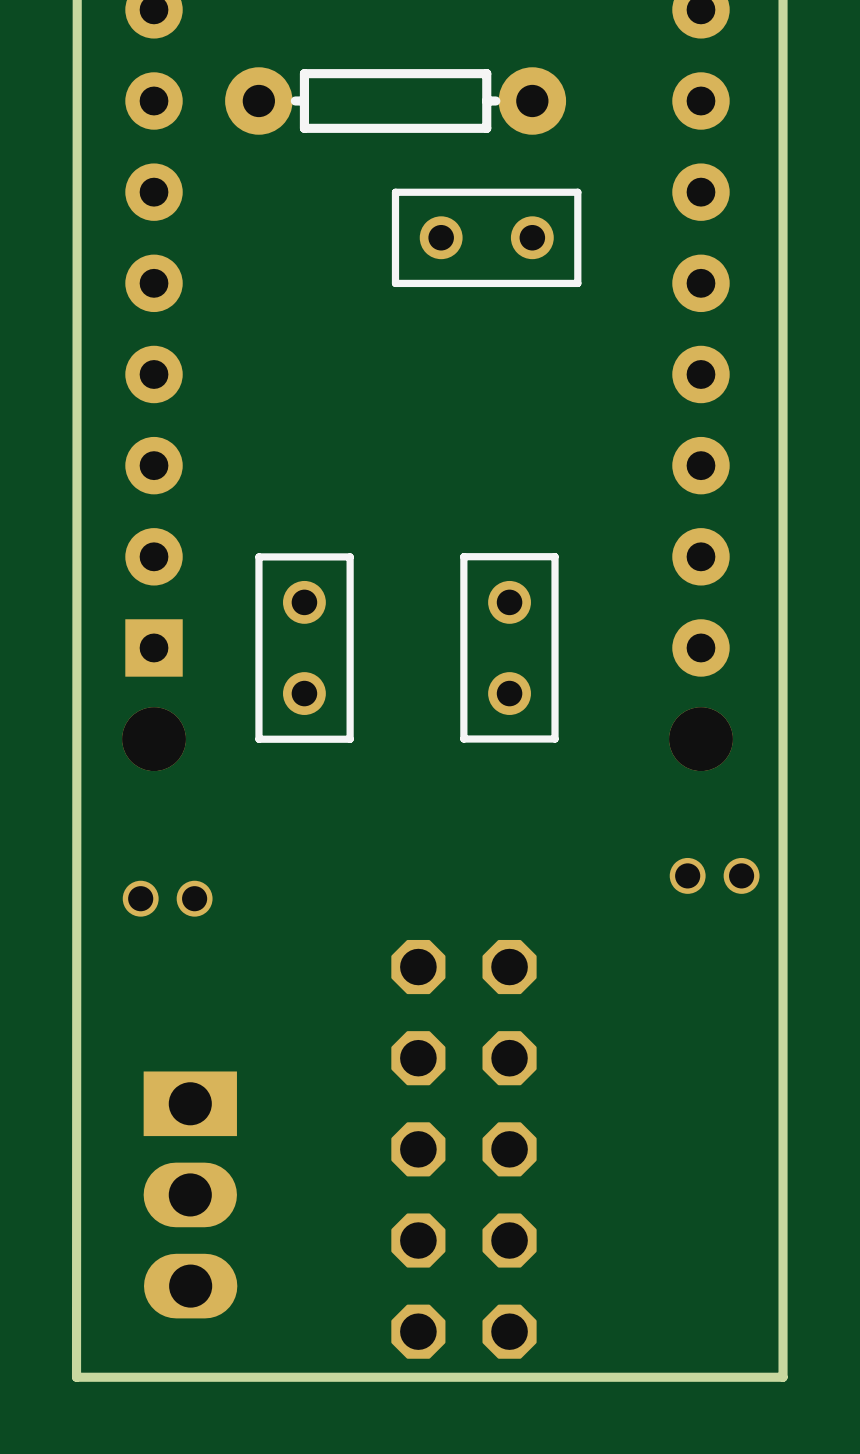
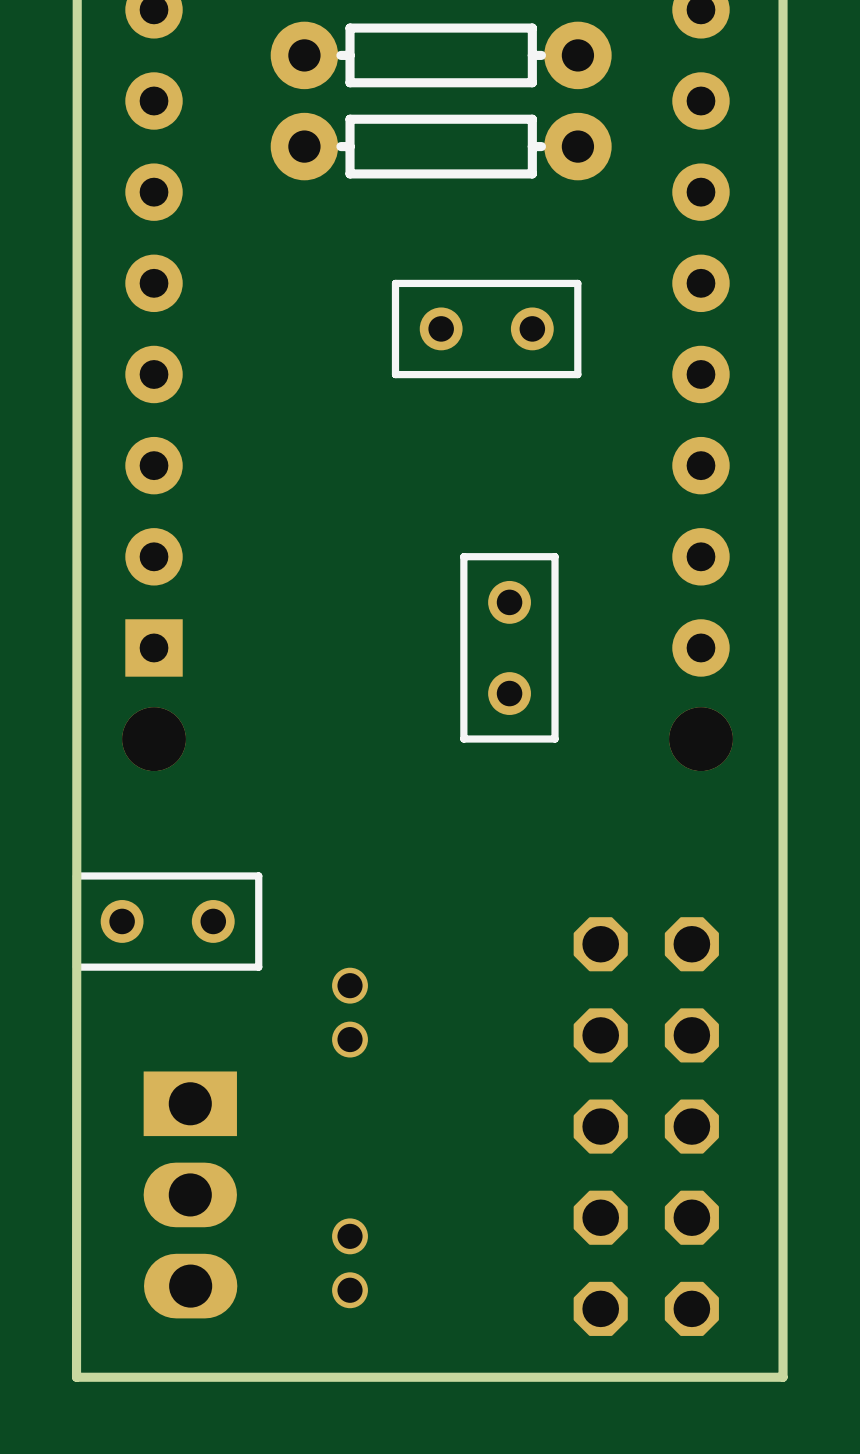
part: none -> (441, 55)
part: (395, 100) -> none
part: none -> (441, 146)
part position: (486, 237) -> (486, 329)
part: (304, 648) -> none
part: (714, 875) -> none
part footprint: [122, 880, 213, 917] -> [72, 872, 263, 971]
part: none -> (600, 944)
part: none -> (691, 944)
part: (418, 967) -> none
part: (509, 967) -> none
part: none -> (350, 1012)
part: none -> (600, 1035)
part: none -> (691, 1035)
part: (418, 1058) -> none
part: (509, 1058) -> none
part: none -> (600, 1126)
part: none -> (691, 1126)
part: (418, 1149) -> none
part: (509, 1149) -> none
part: none -> (600, 1217)
part: none -> (691, 1217)
part: (418, 1240) -> none
part: (509, 1240) -> none
part: none -> (350, 1263)
part: none -> (600, 1308)
part: none -> (691, 1308)
part: (418, 1331) -> none
part: (509, 1331) -> none

